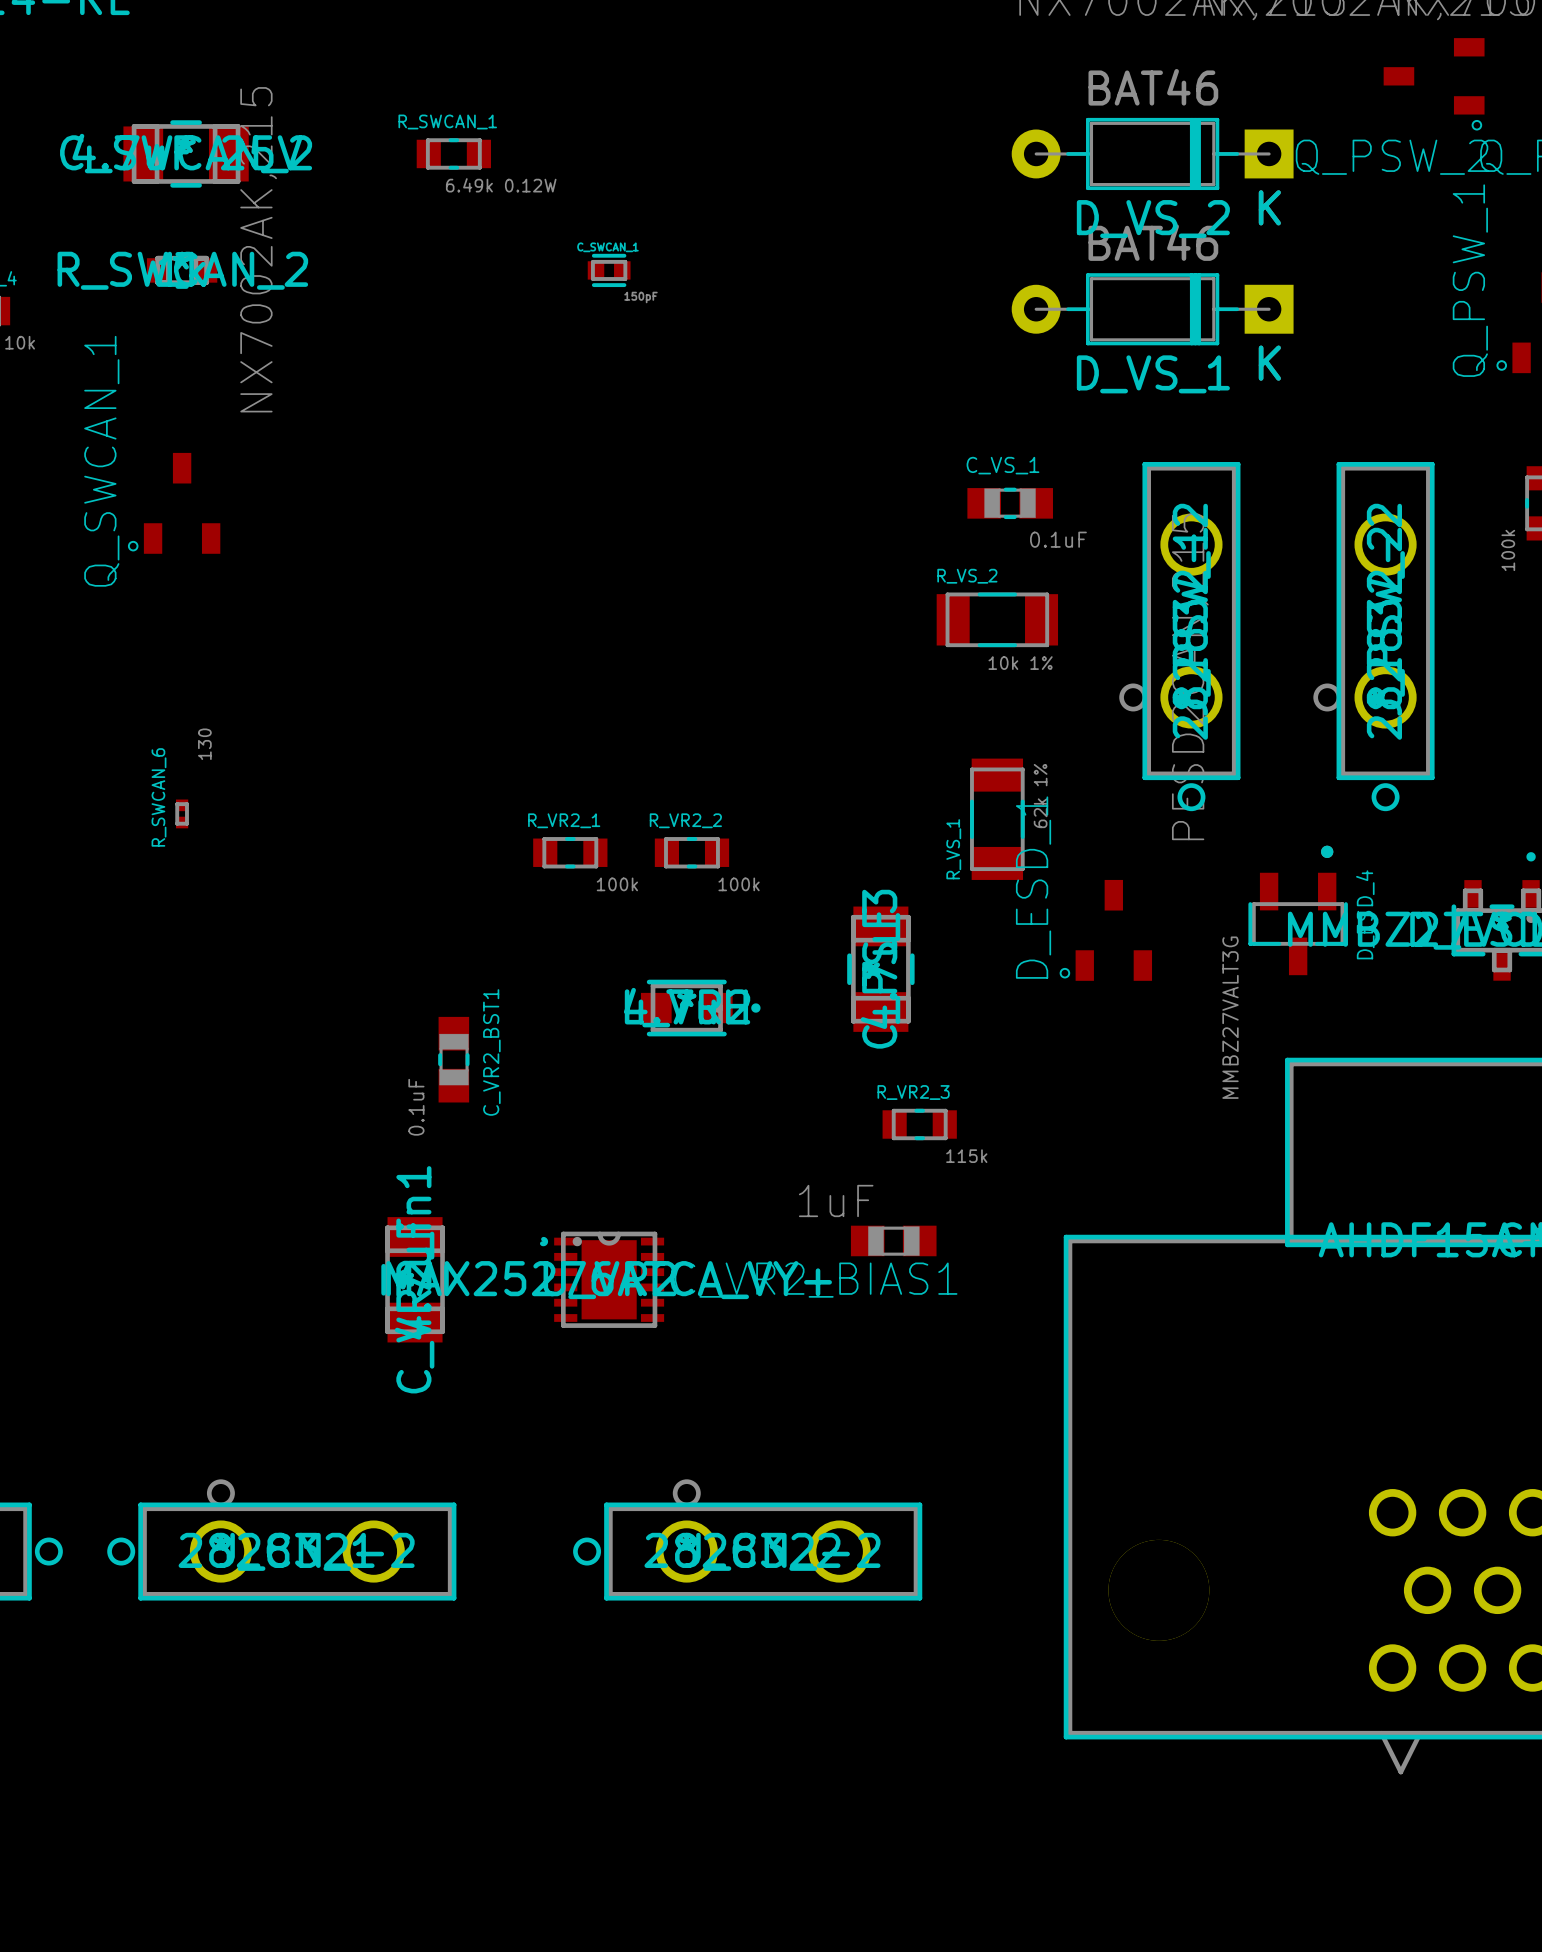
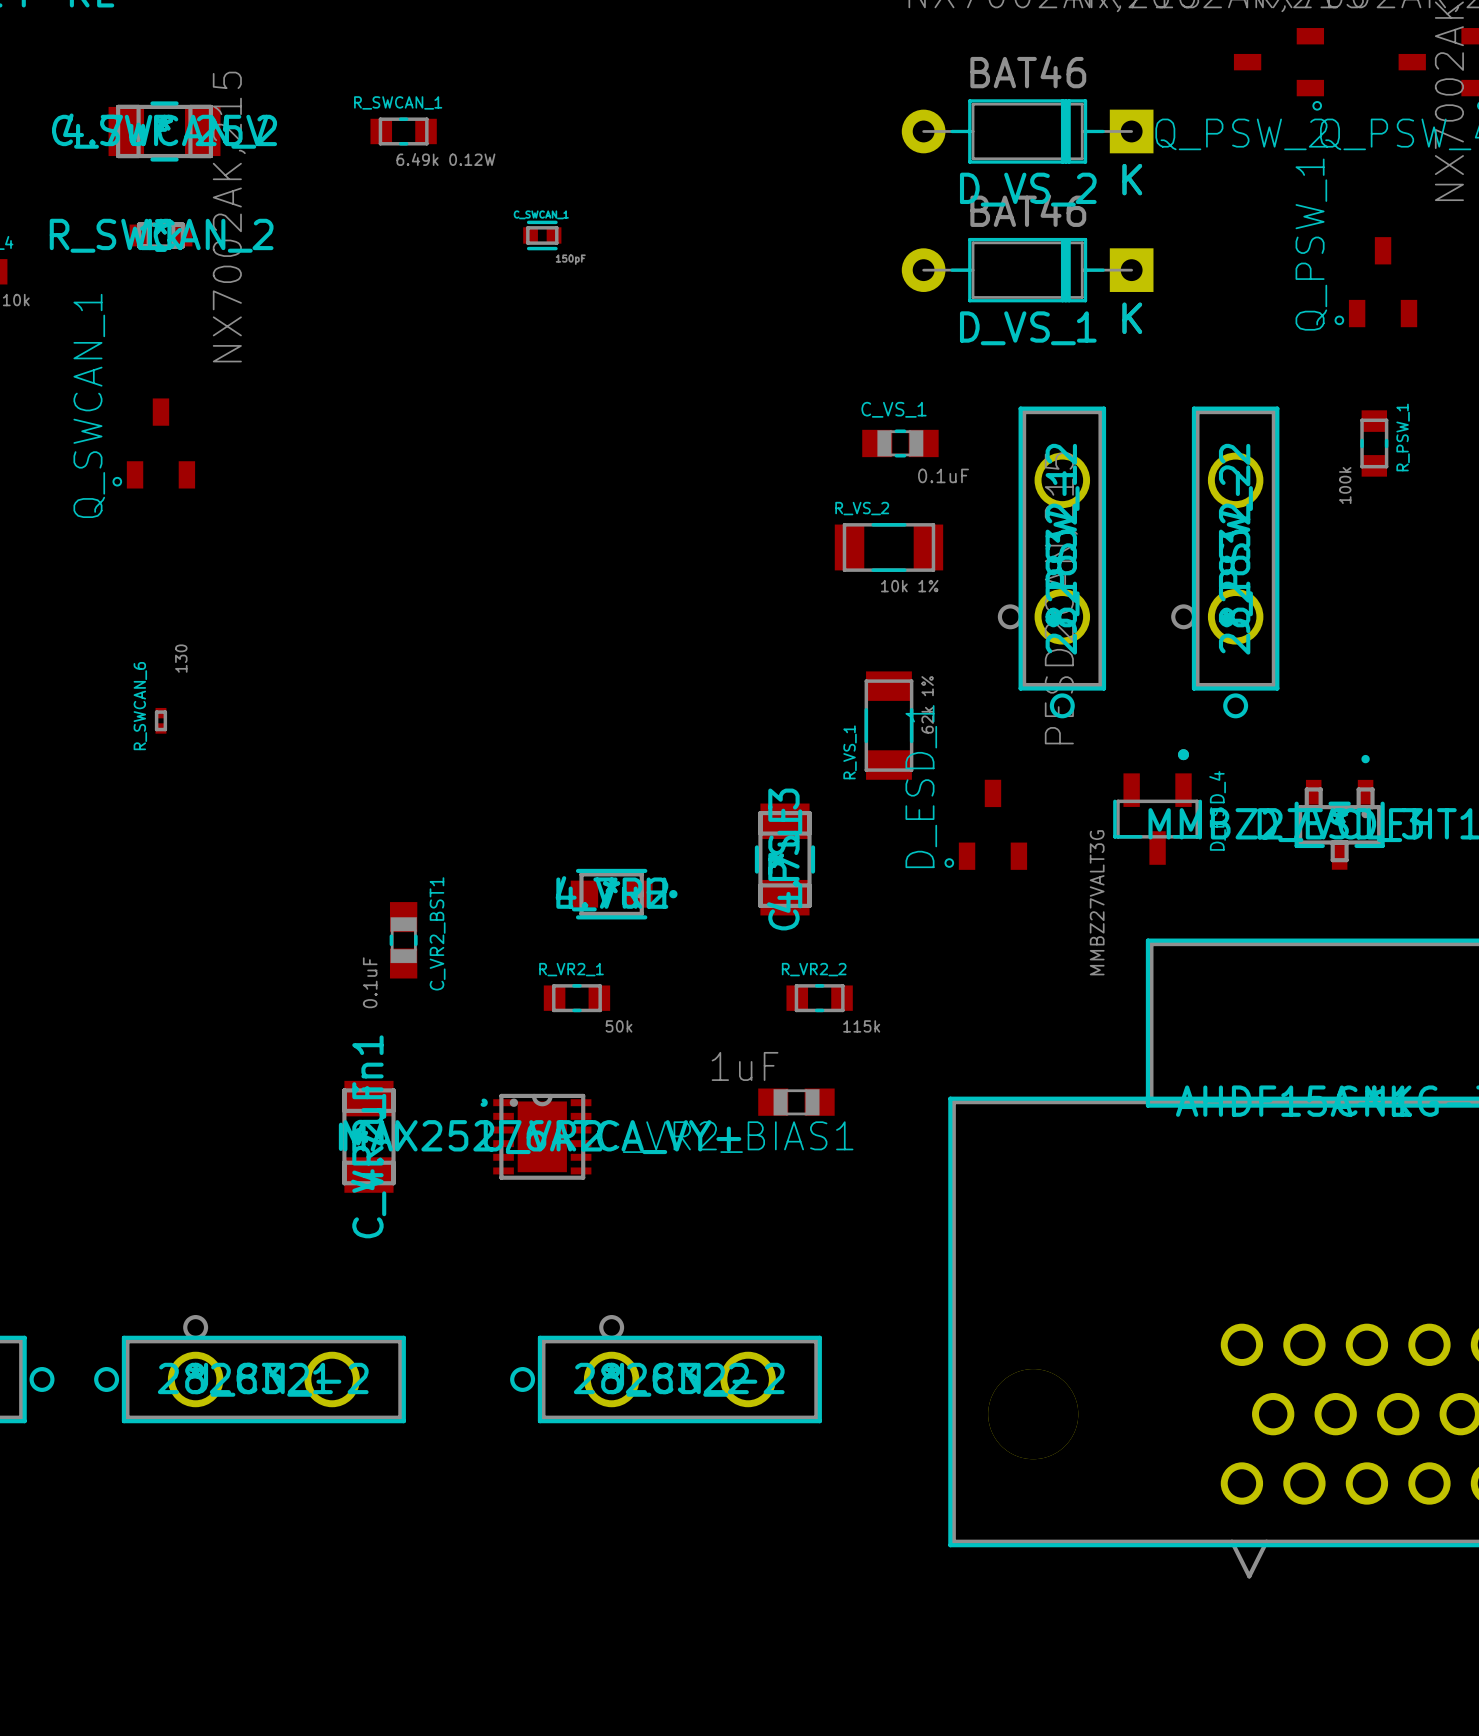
R_VR2_1 position: (570, 852) -> (576, 998)
R_VR2_2: 100k (691, 852) -> none
R_VR2_1 value: 100k (617, 884) -> 50k (619, 1026)
R_VR2_3 name: R_VR2_3 (913, 1092) -> R_VR2_2 (814, 969)

